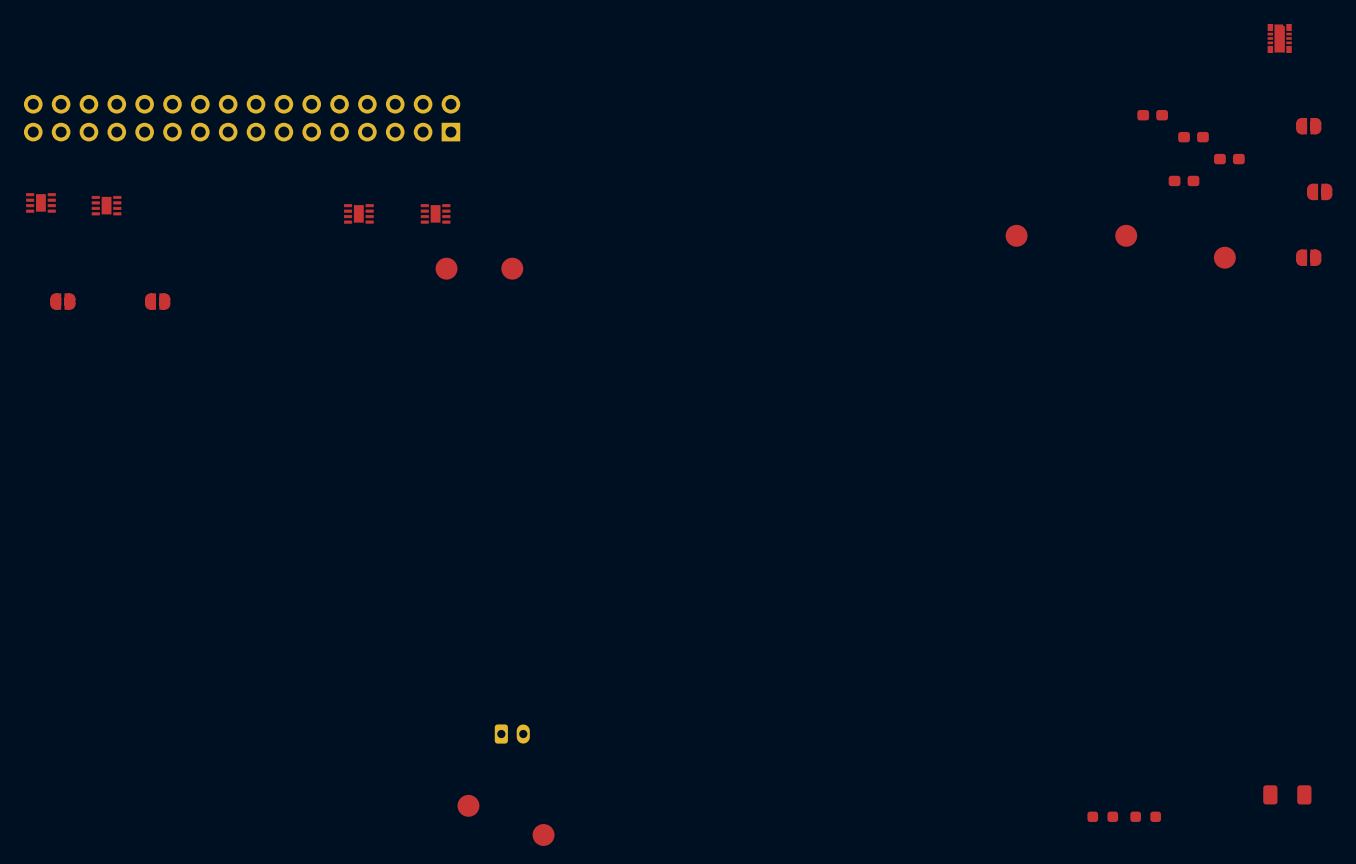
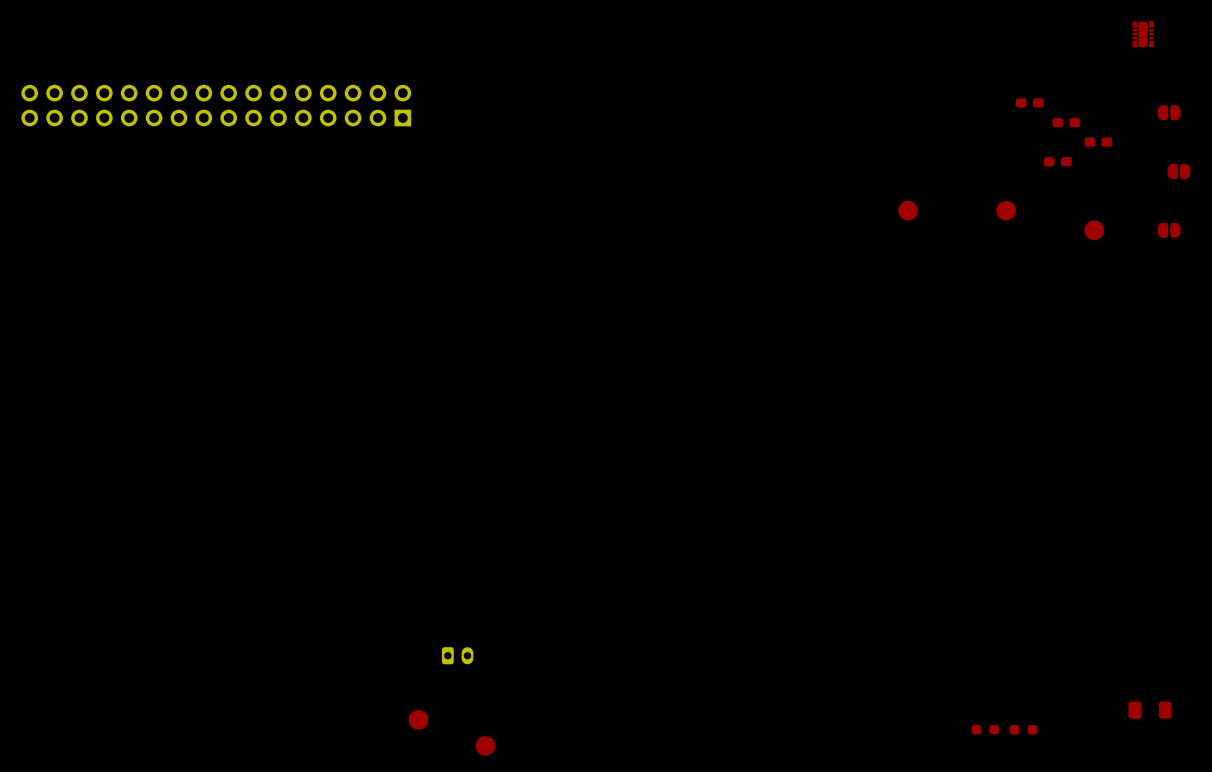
part: (40, 202) -> none
part: (106, 205) -> none
part: (358, 213) -> none
part: (435, 213) -> none
part: (446, 268) -> none
part: (512, 268) -> none
part: (62, 301) -> none
part: (157, 301) -> none

